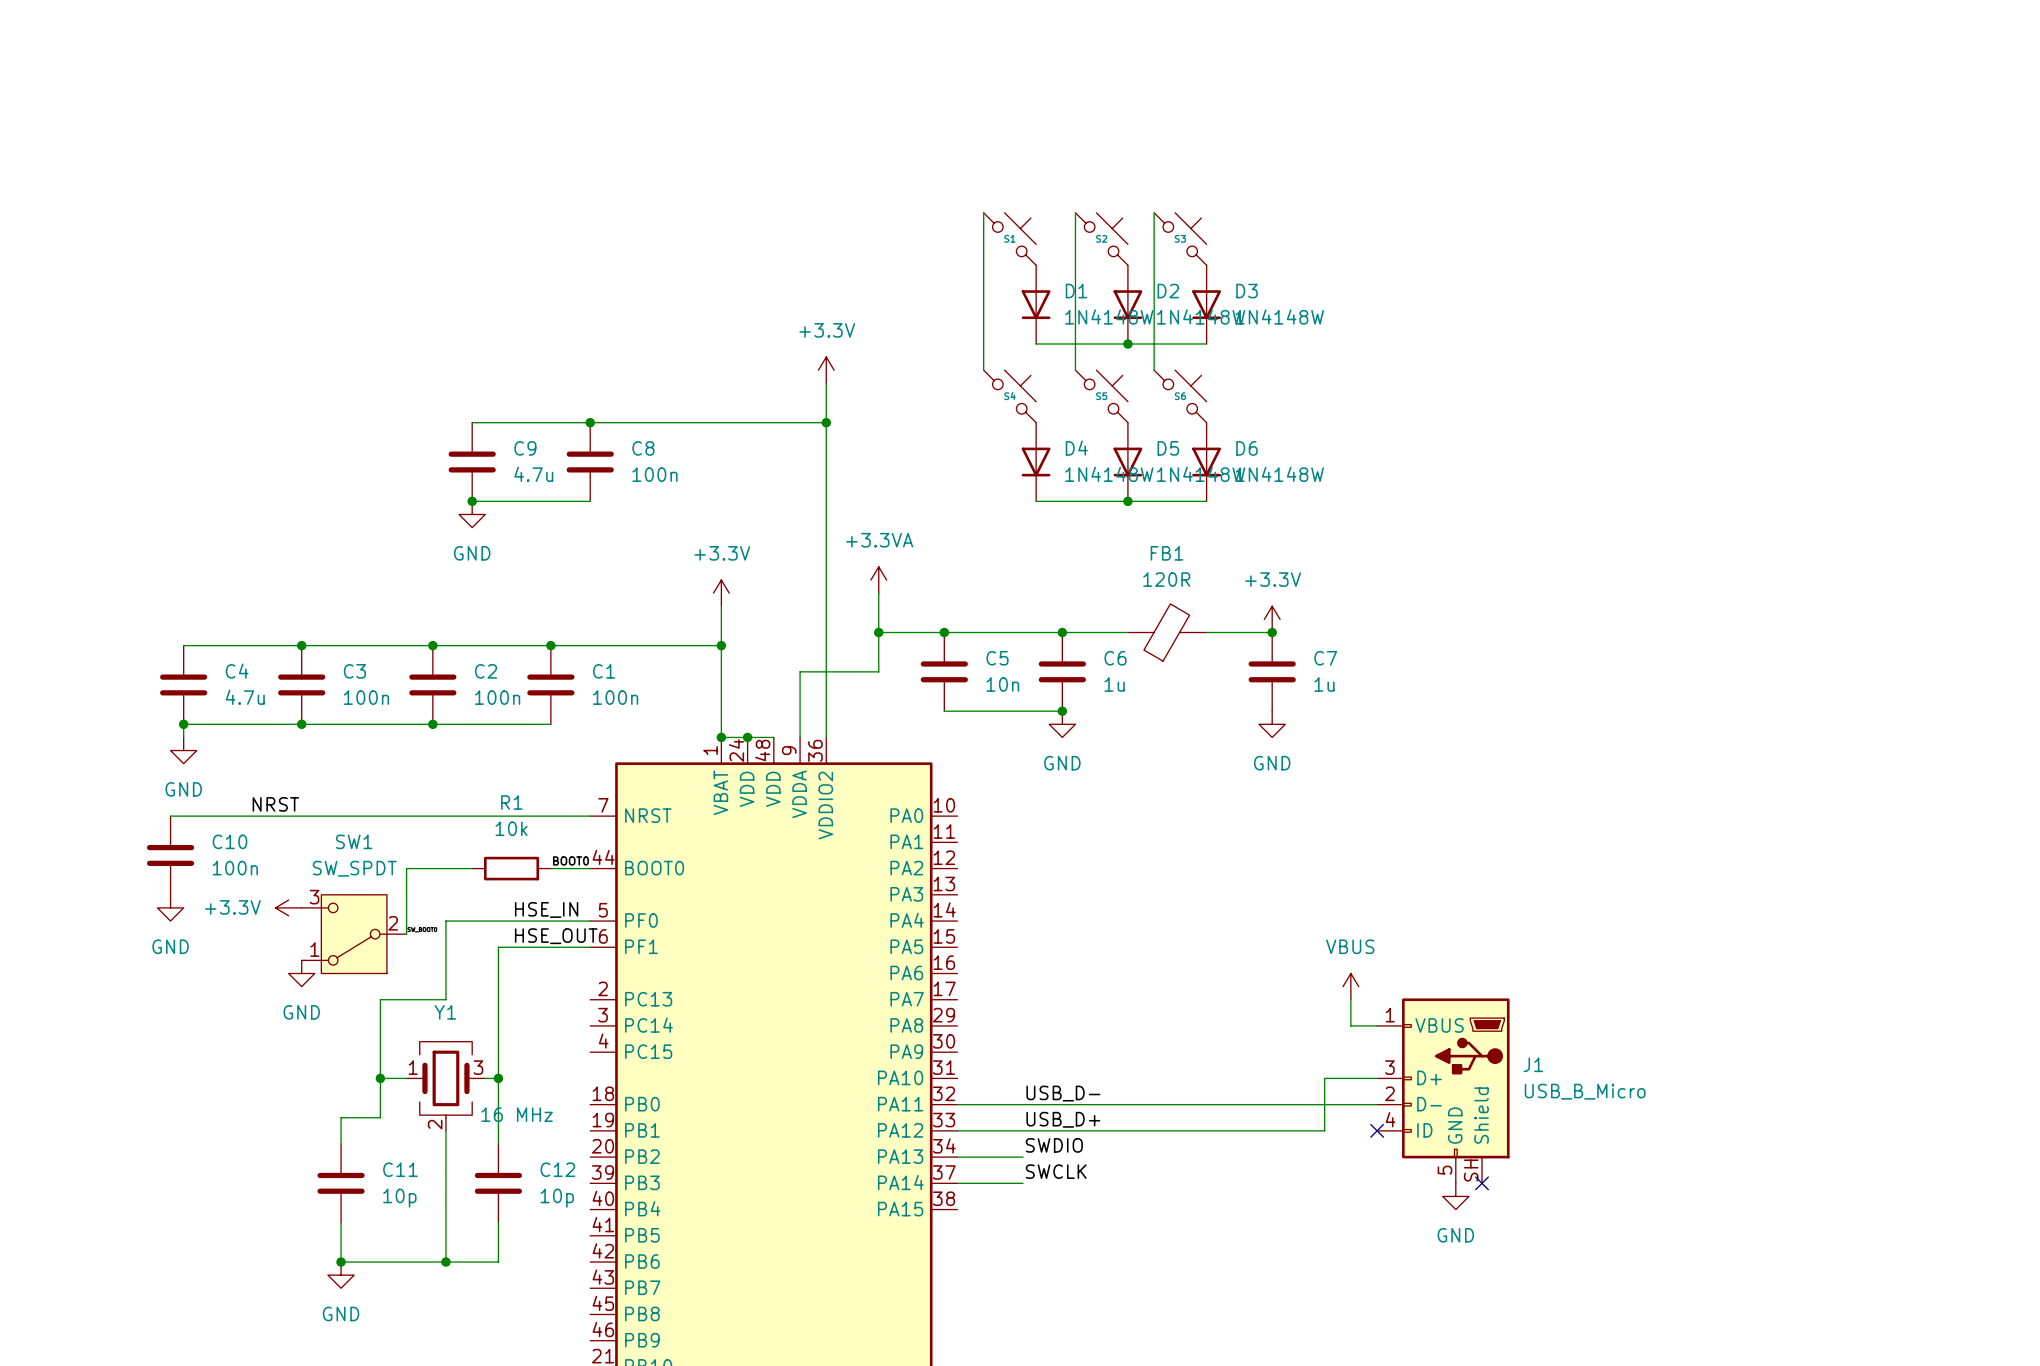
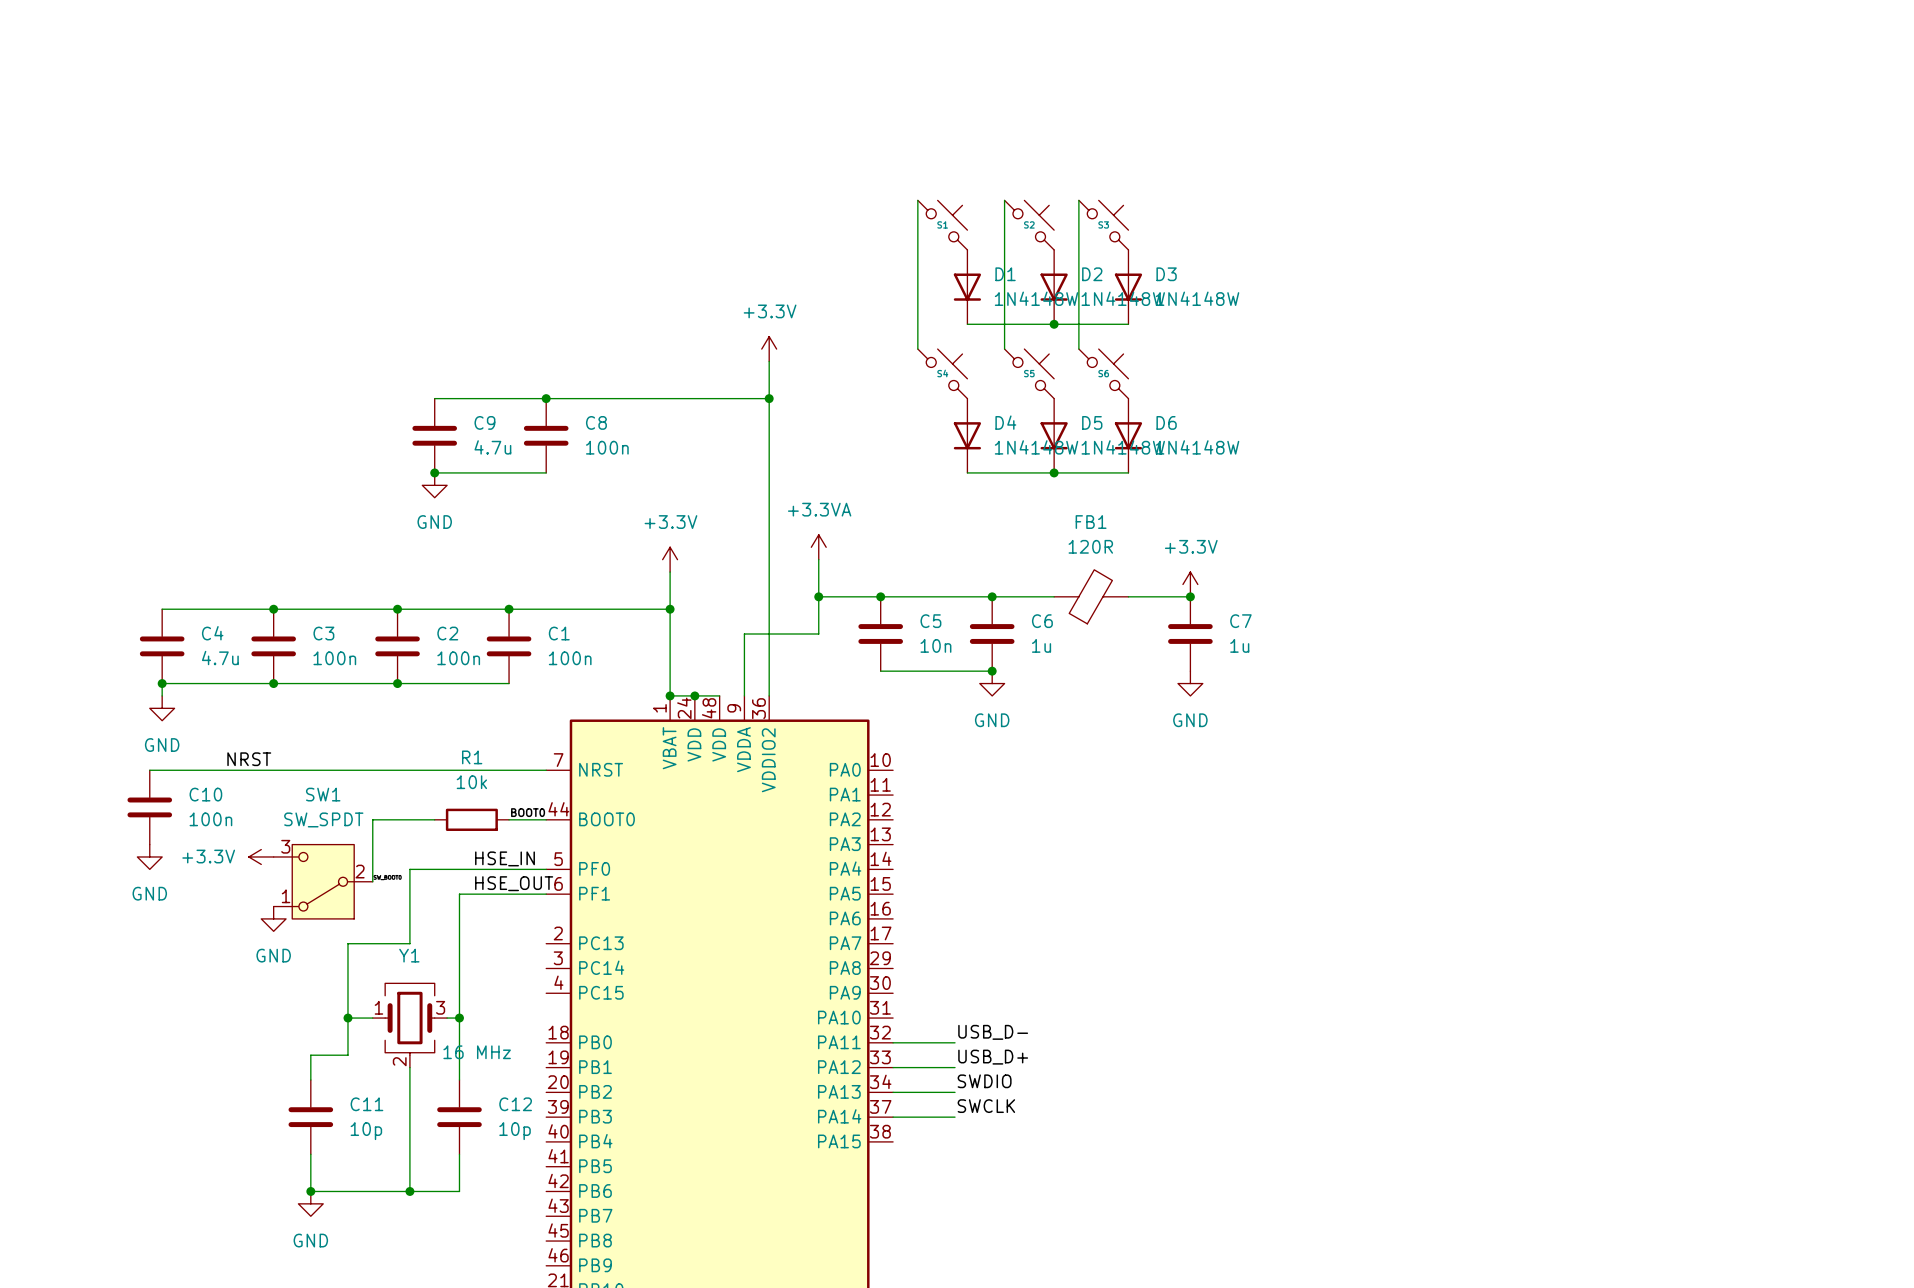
power symbol: VBUS (1350, 986) -> none
wire: (1350, 999) (1350, 1025) (1377, 1025) -> none
wire: (1377, 1078) (1324, 1078) (1324, 1130) (1023, 1130) -> none
J1: USB_B_Micro (1443, 1090) -> none
wire: (1023, 1104) (1377, 1104) -> none
no-connect mark: (1377, 1130) -> none
no-connect mark: (1482, 1183) -> none
power symbol: GND (1455, 1196) -> none

